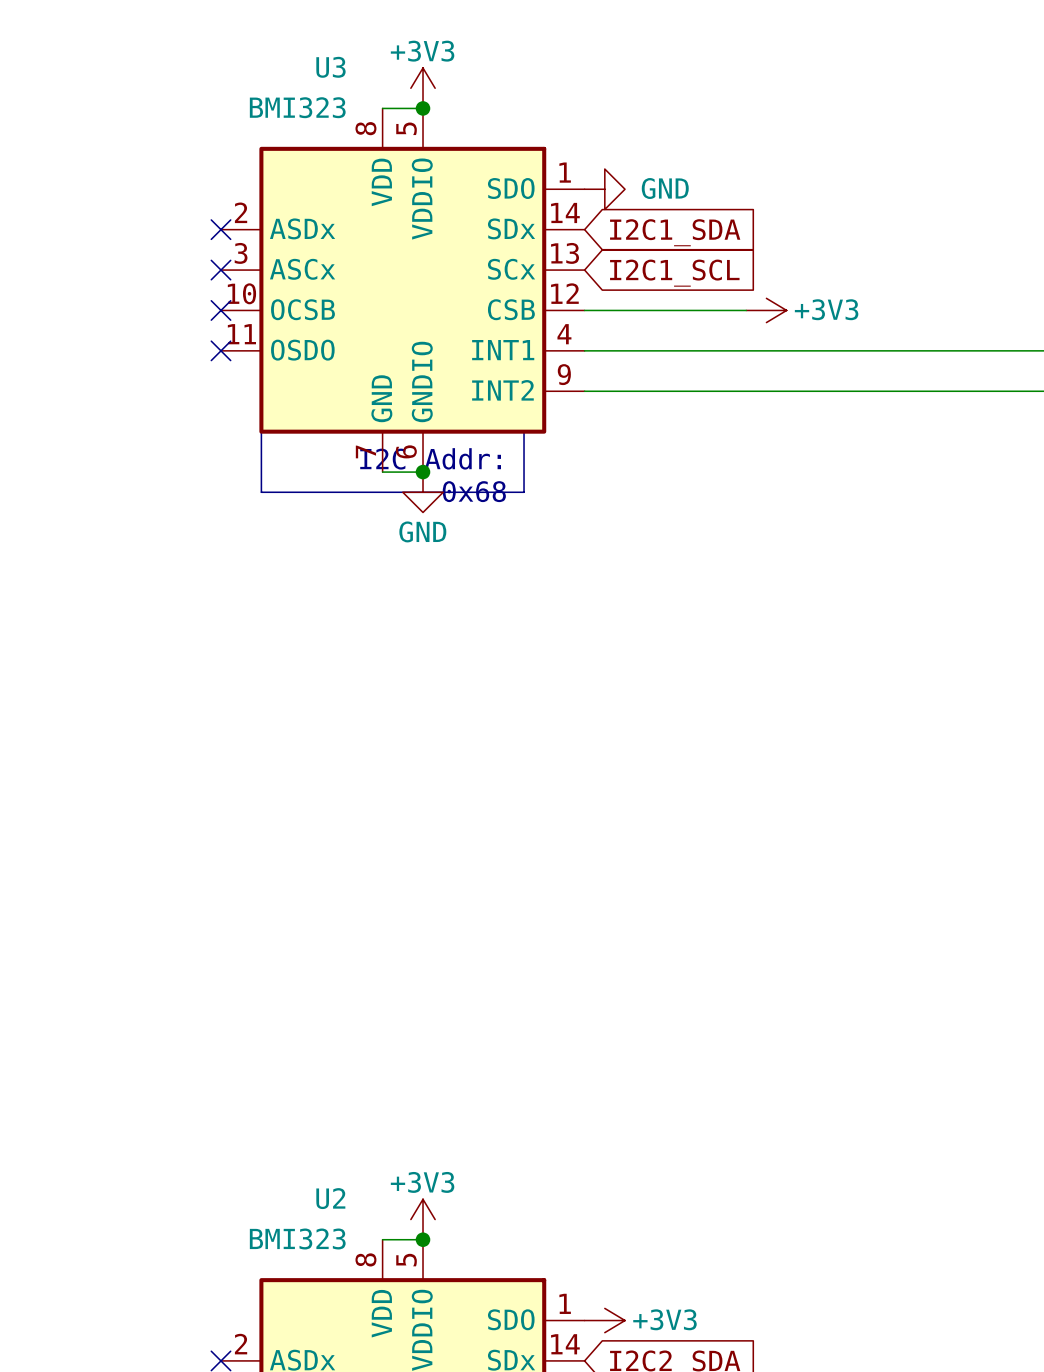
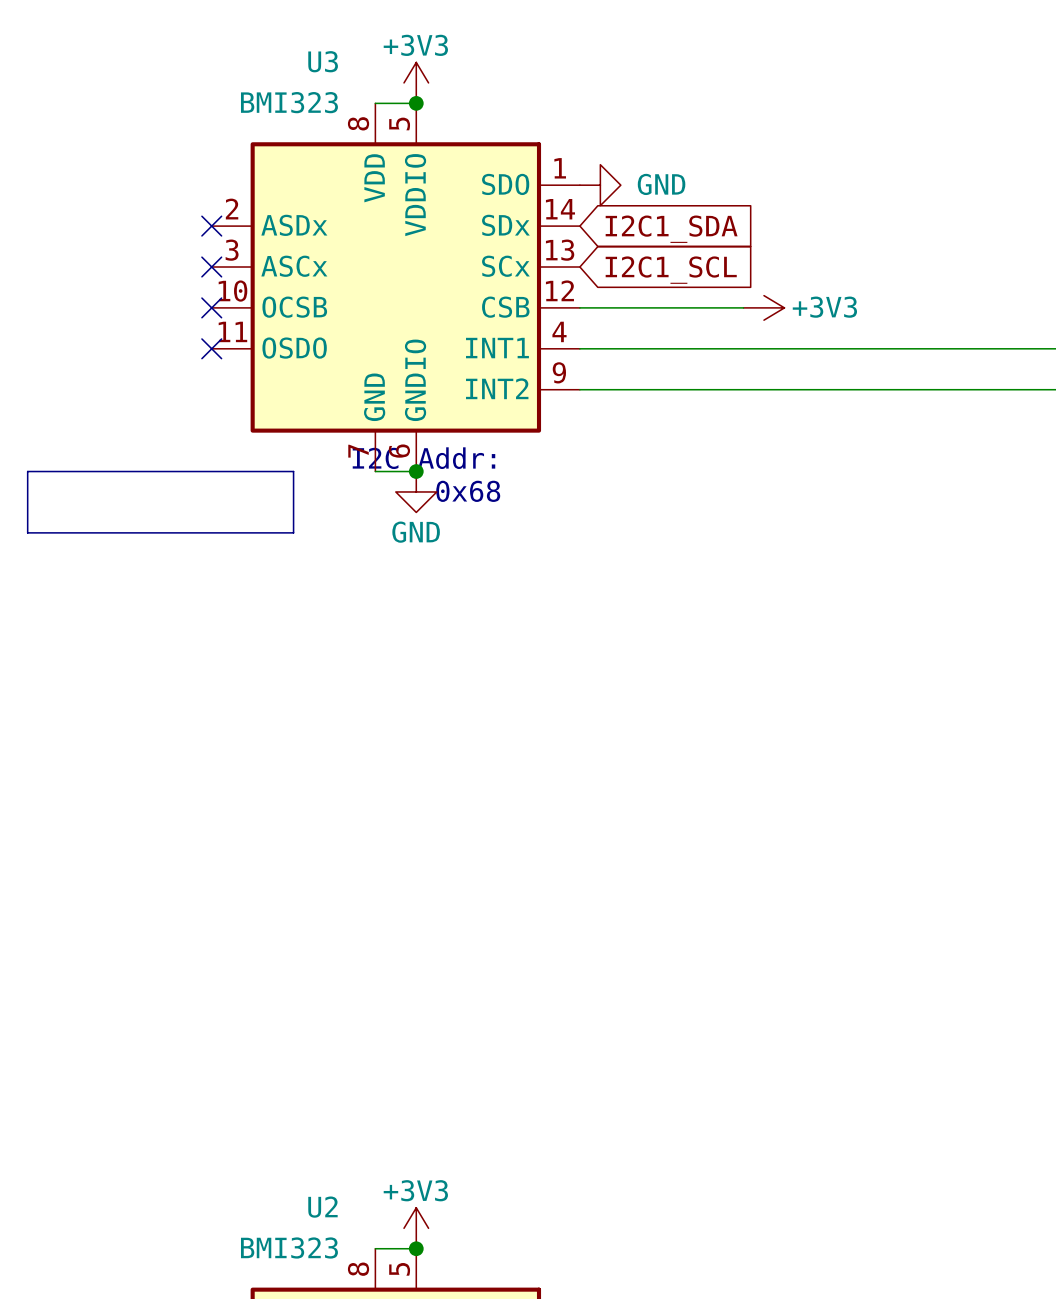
line: (261, 431) (524, 431) (524, 492) (261, 492) (261, 431) -> (27, 471) (293, 471) (293, 532) (27, 532) (27, 471)

